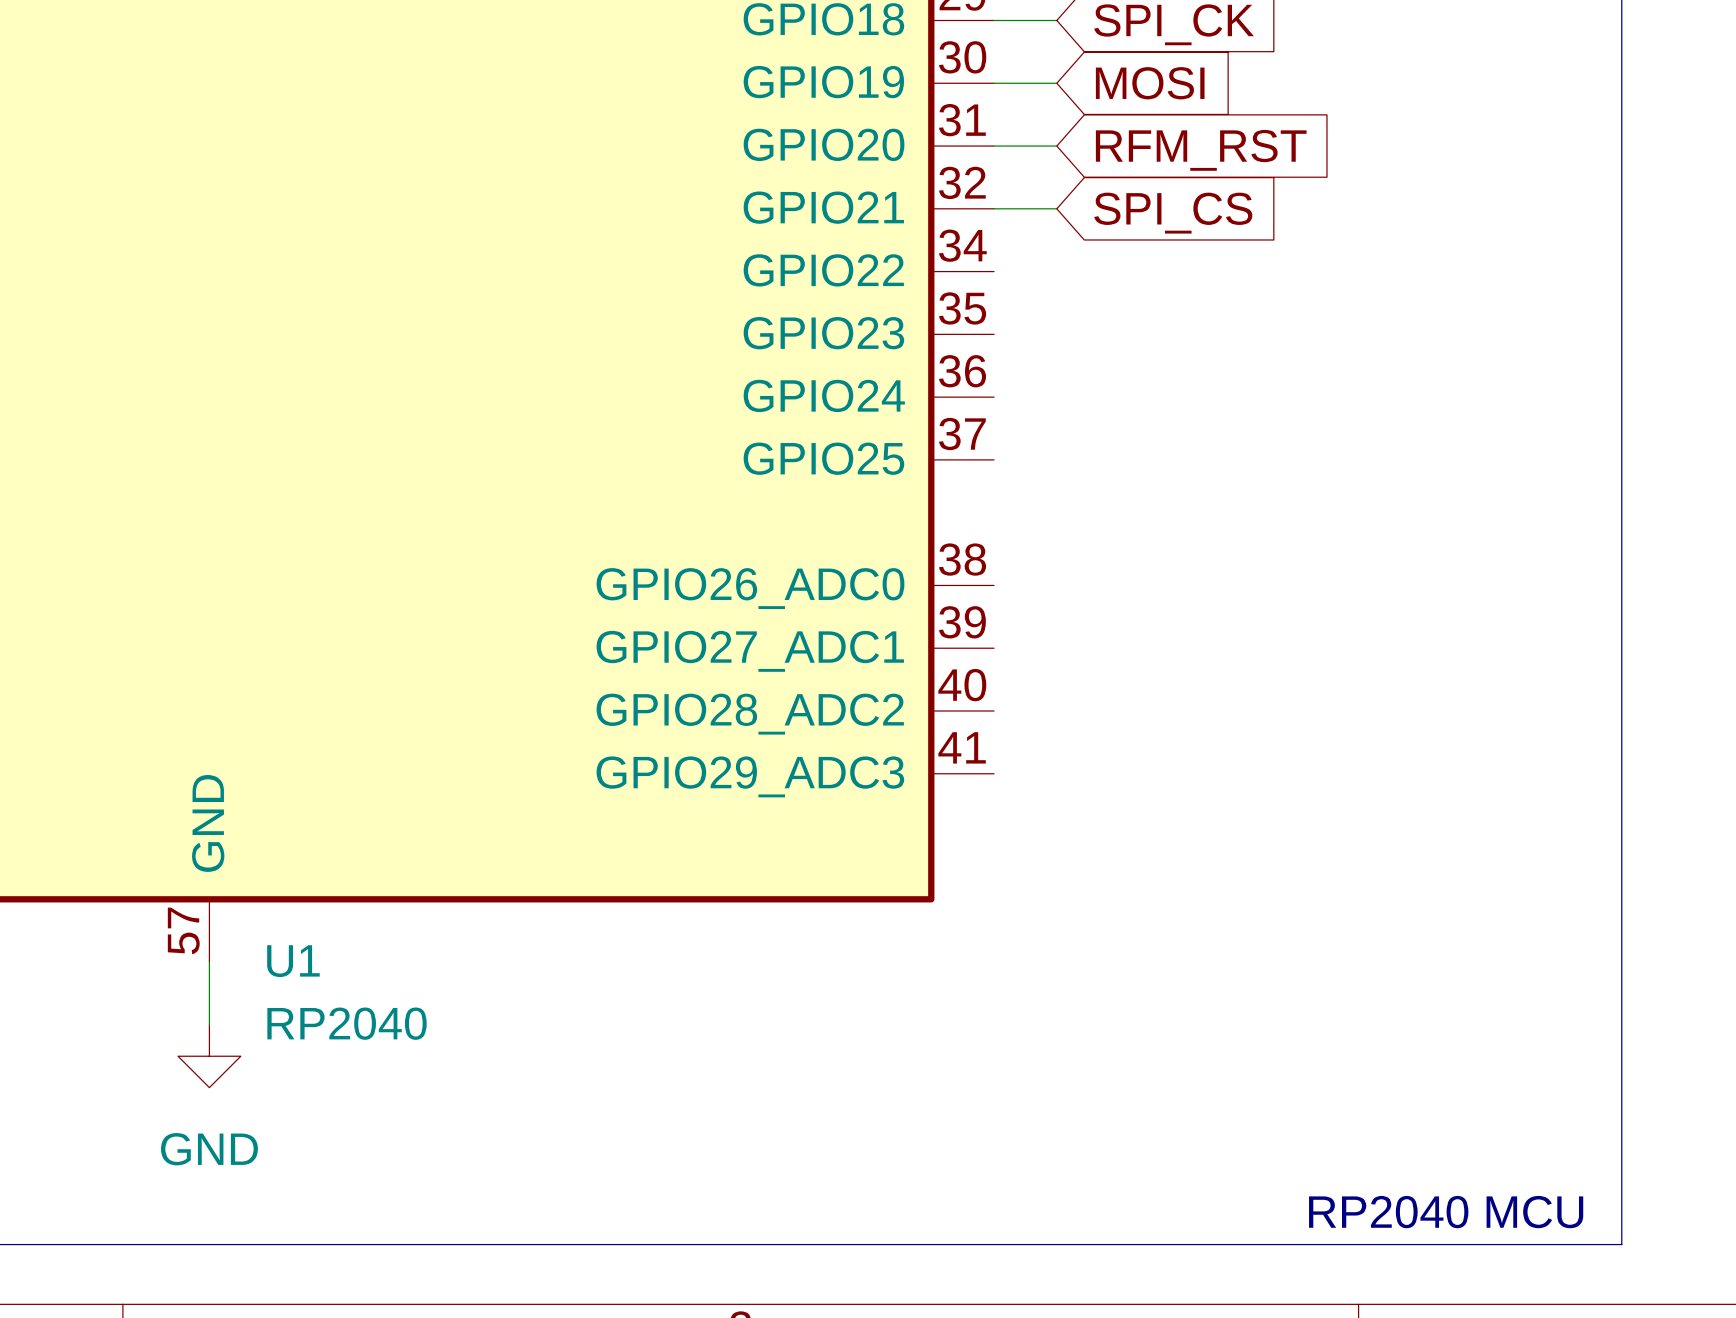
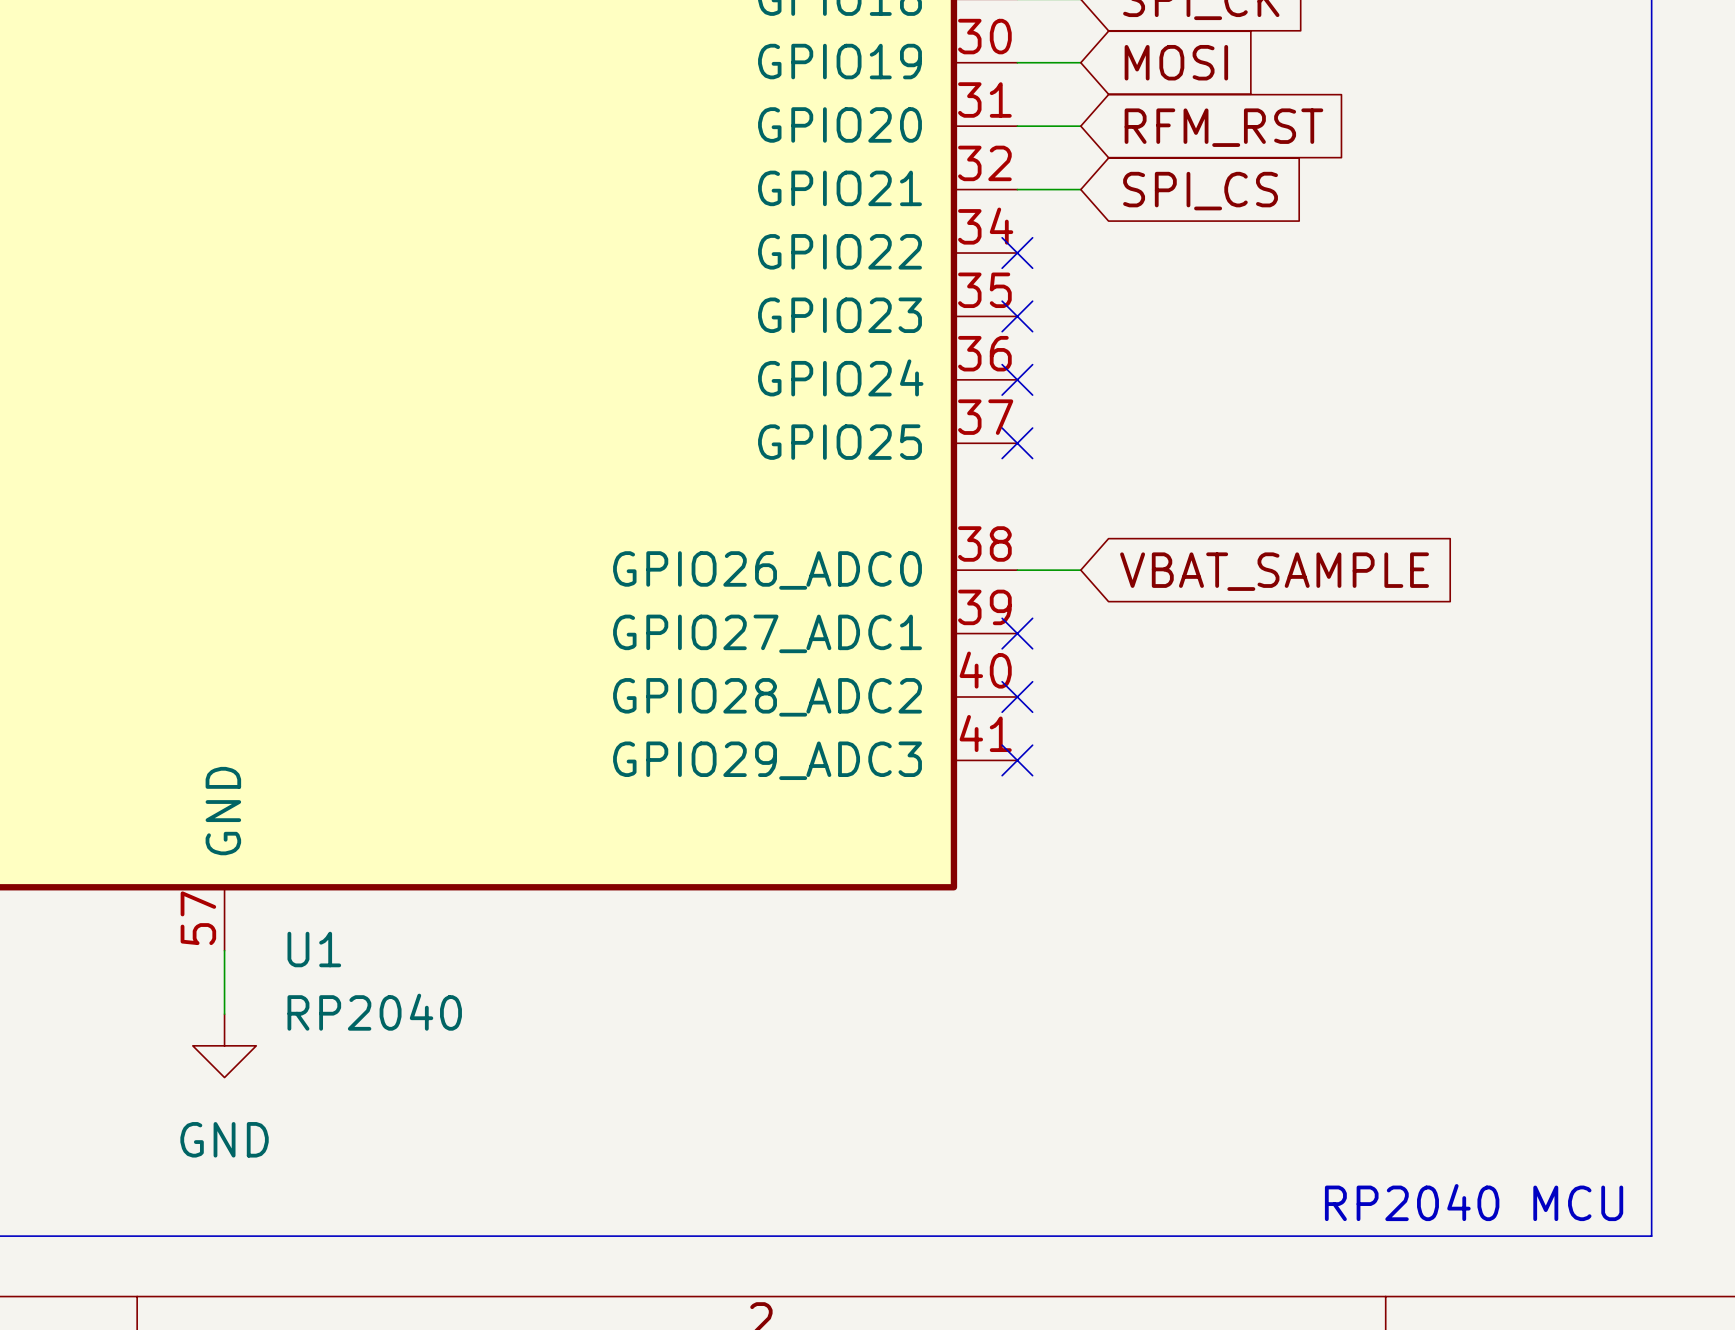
no-connect mark: none -> (1017, 253)
no-connect mark: none -> (1017, 316)
no-connect mark: none -> (1017, 379)
no-connect mark: none -> (1017, 443)
wire: none -> (1017, 570) (1080, 570)
global label: none -> VBAT_SAMPLE (1274, 571)
no-connect mark: none -> (1017, 633)
no-connect mark: none -> (1017, 696)
no-connect mark: none -> (1017, 760)

